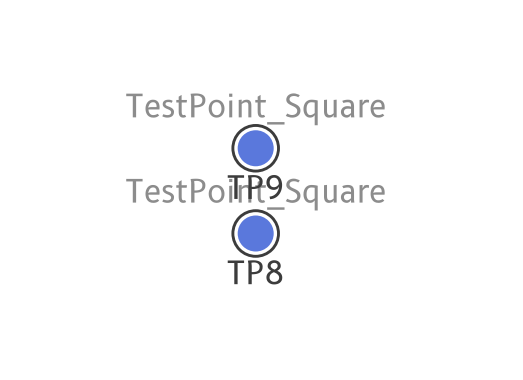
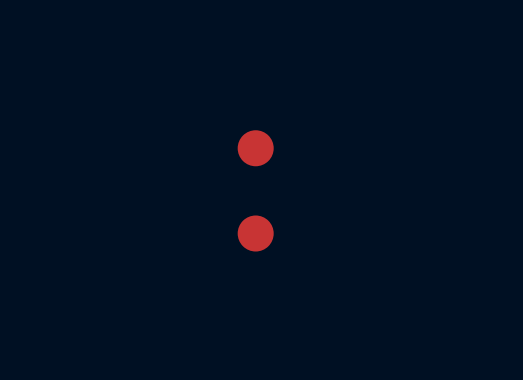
TP9 side: bottom (255, 148) -> top (255, 148)
TP8 side: bottom (255, 233) -> top (255, 233)

